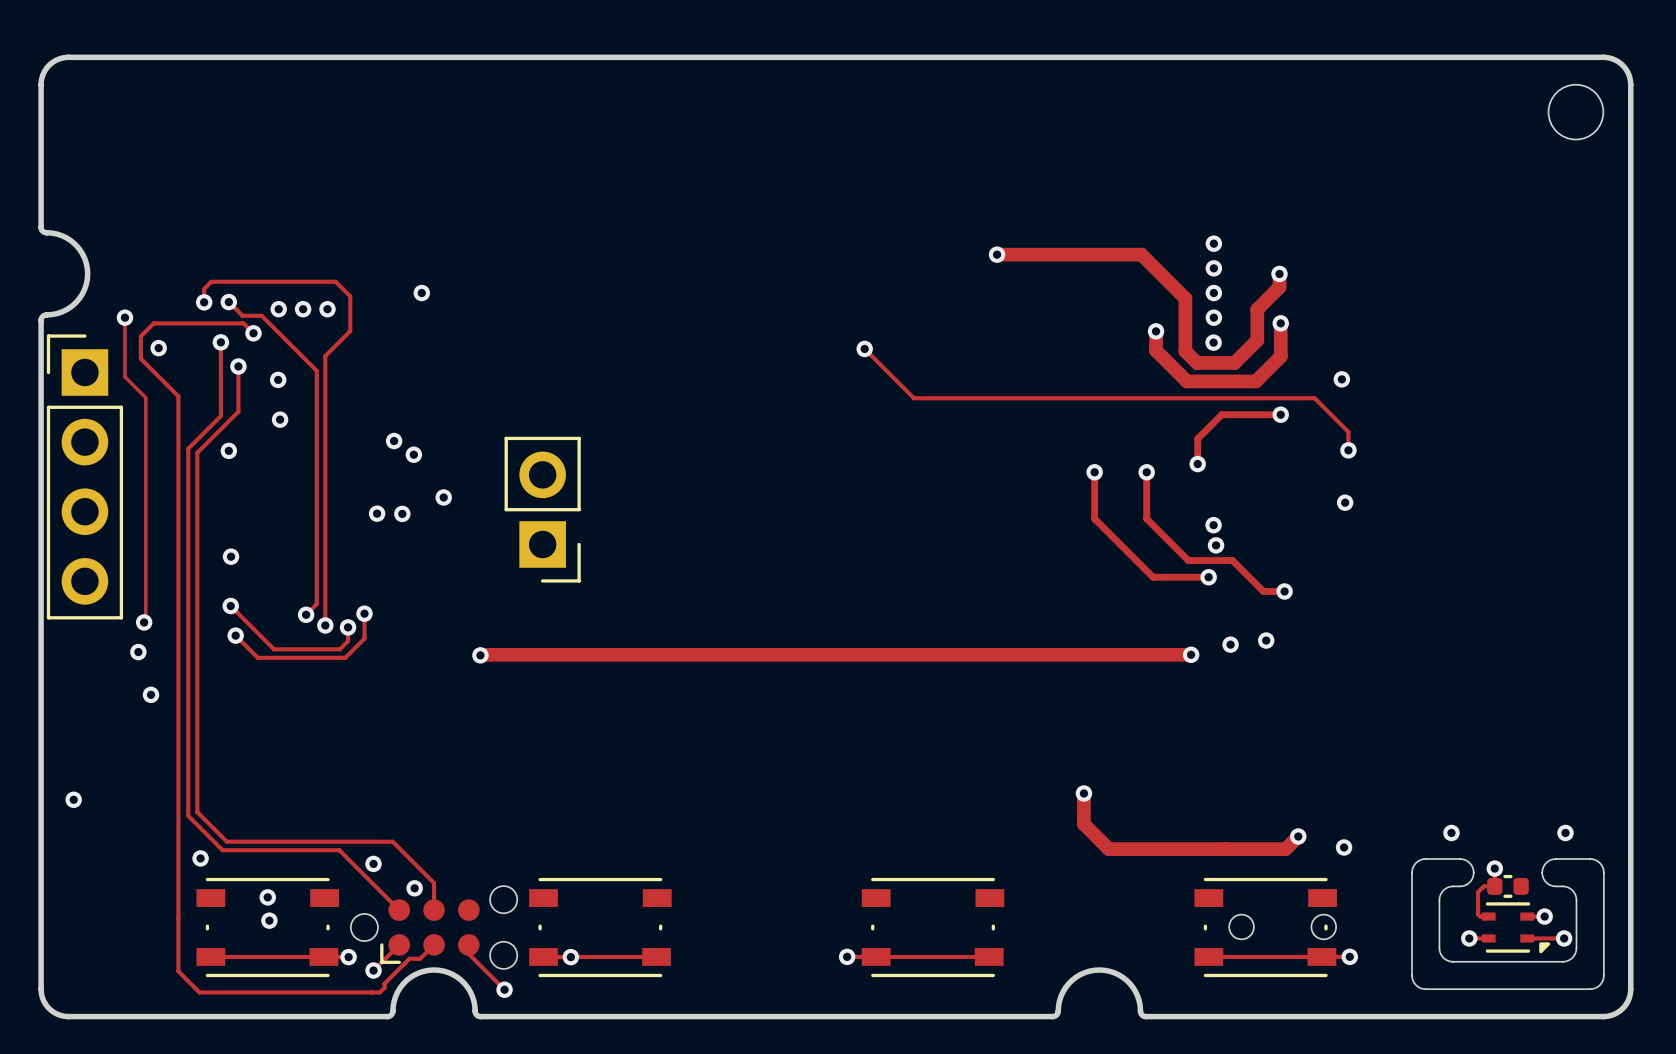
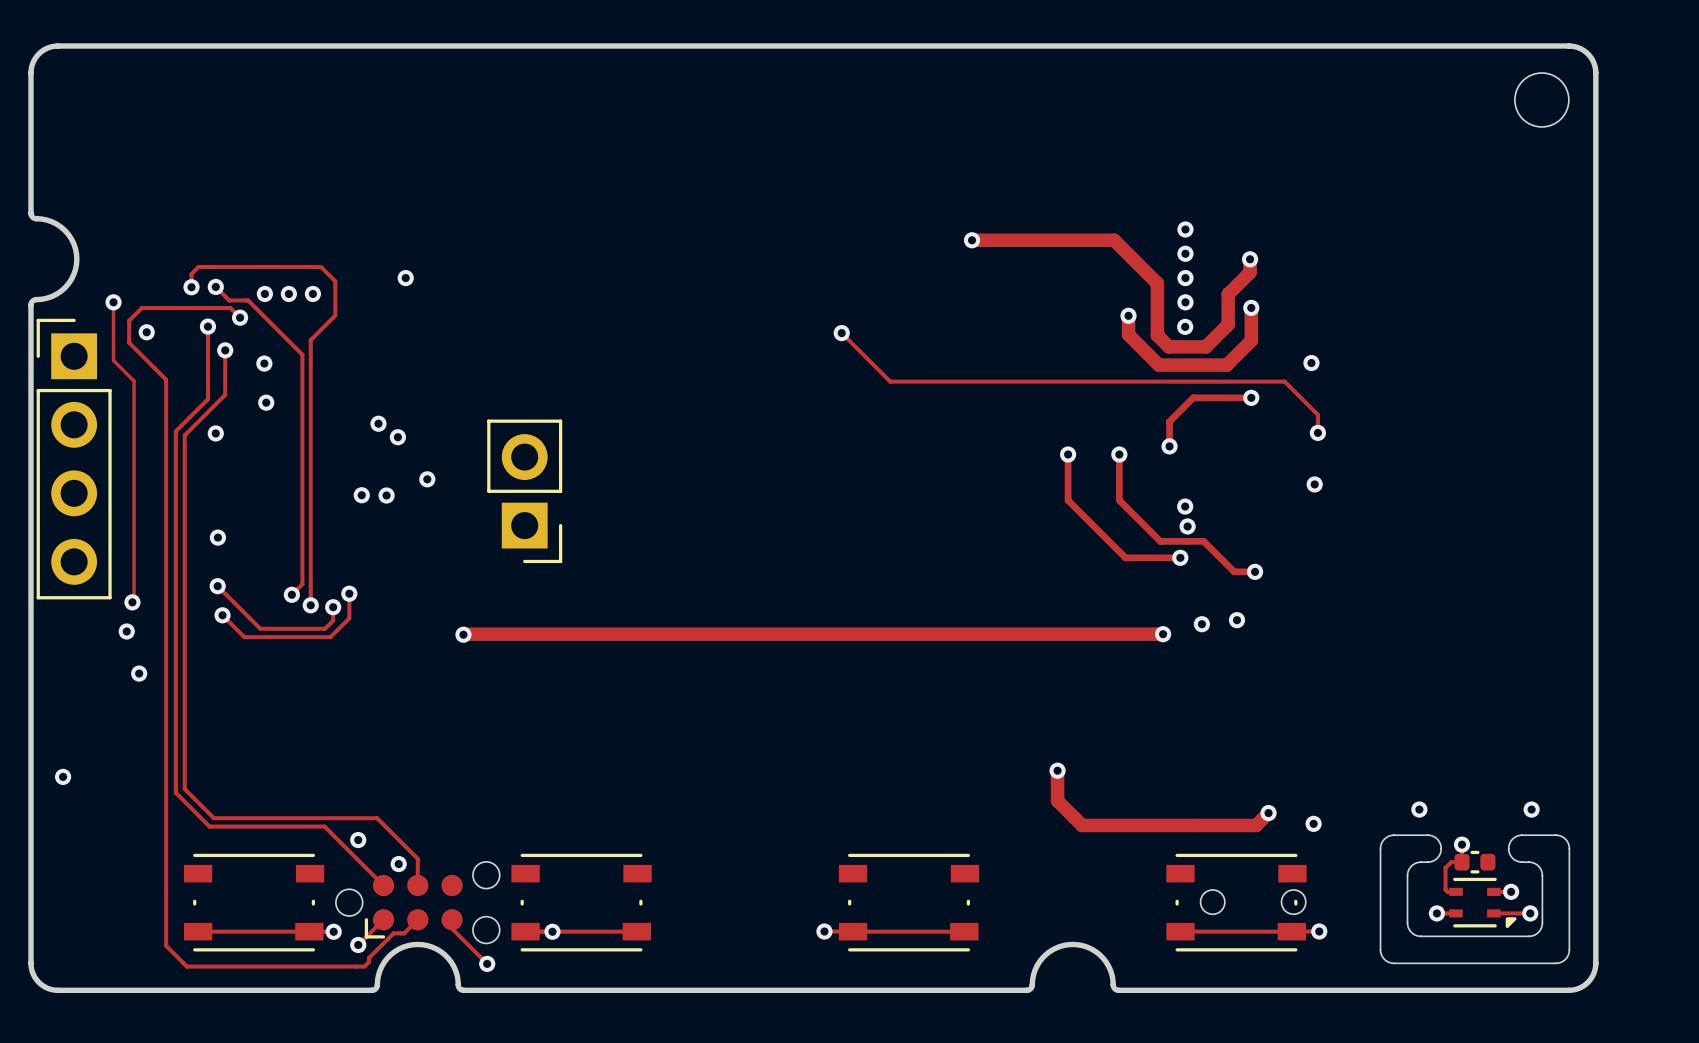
via: (200, 858) -> none
via: (267, 897) -> none
via: (269, 920) -> none

